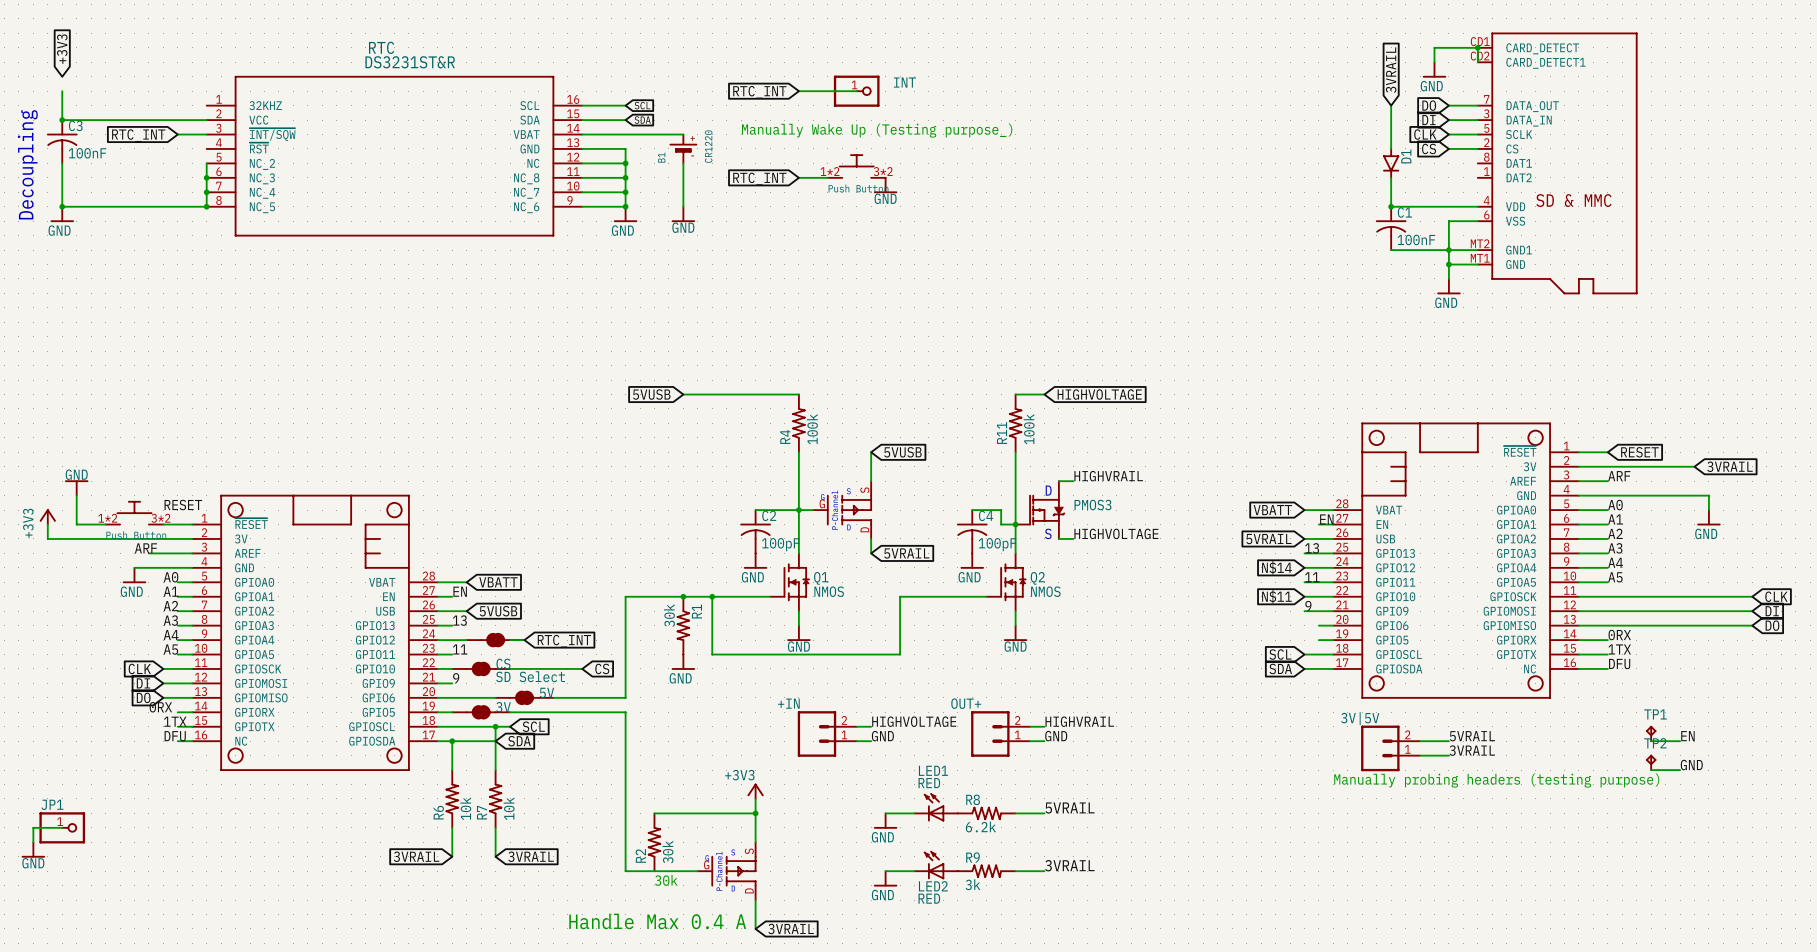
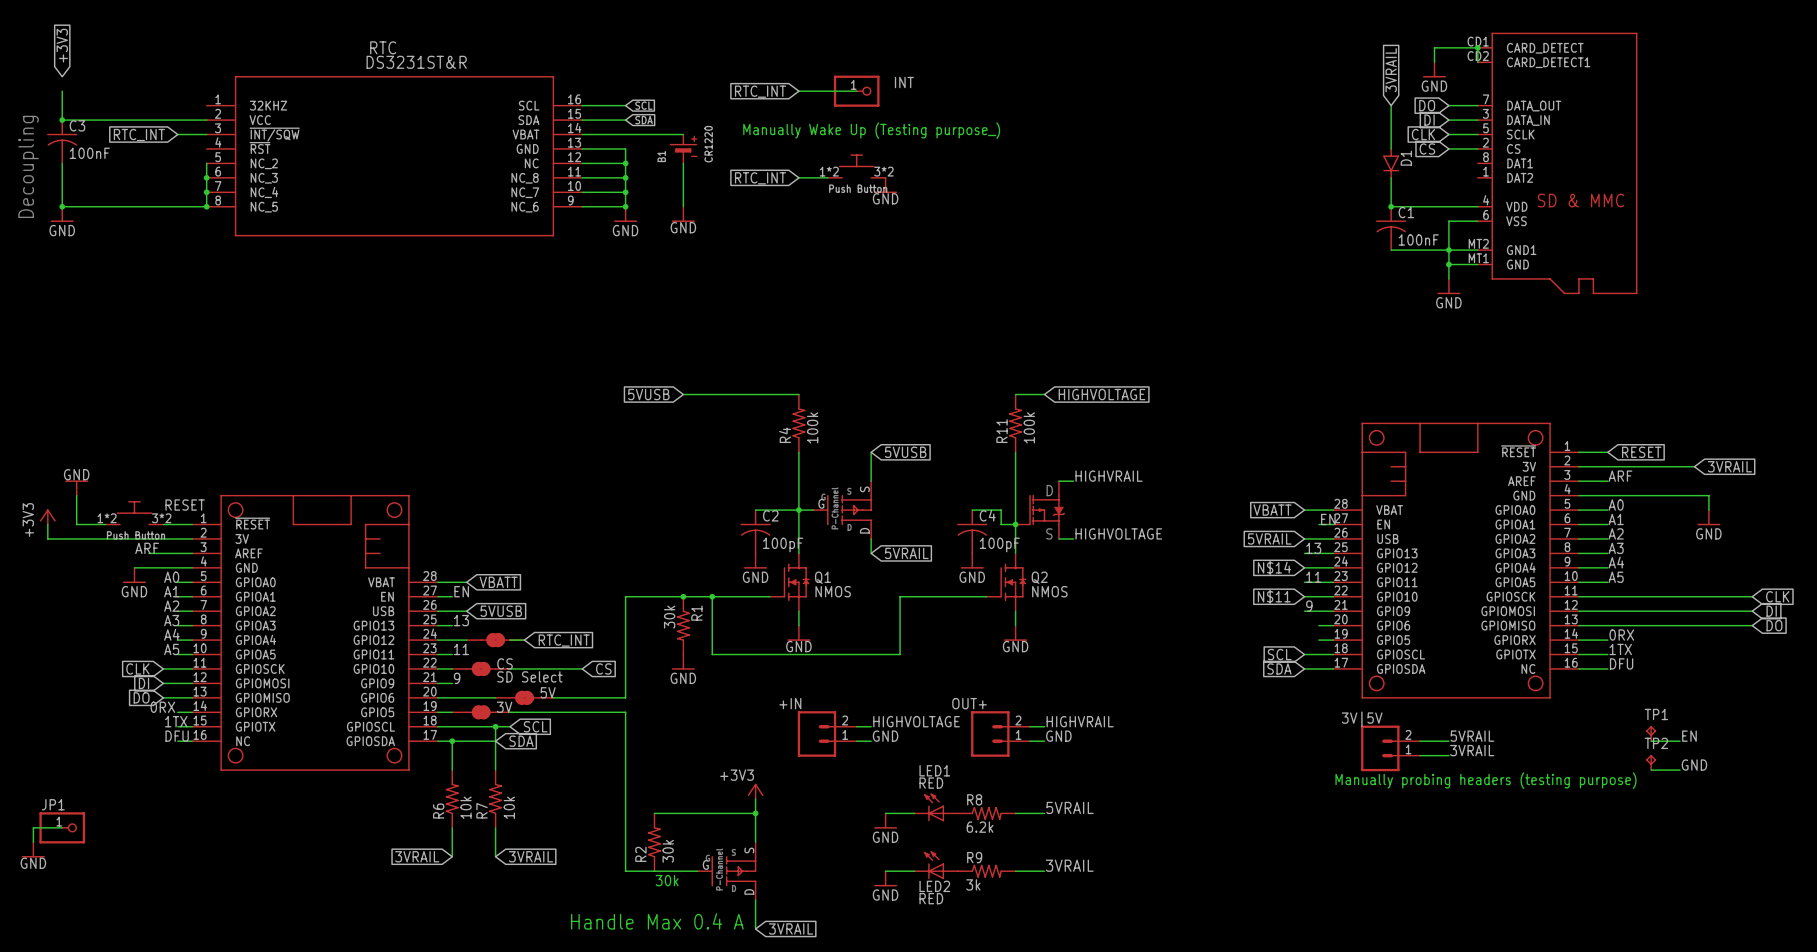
PMOS3 name: PMOS3 (1092, 505) -> none

